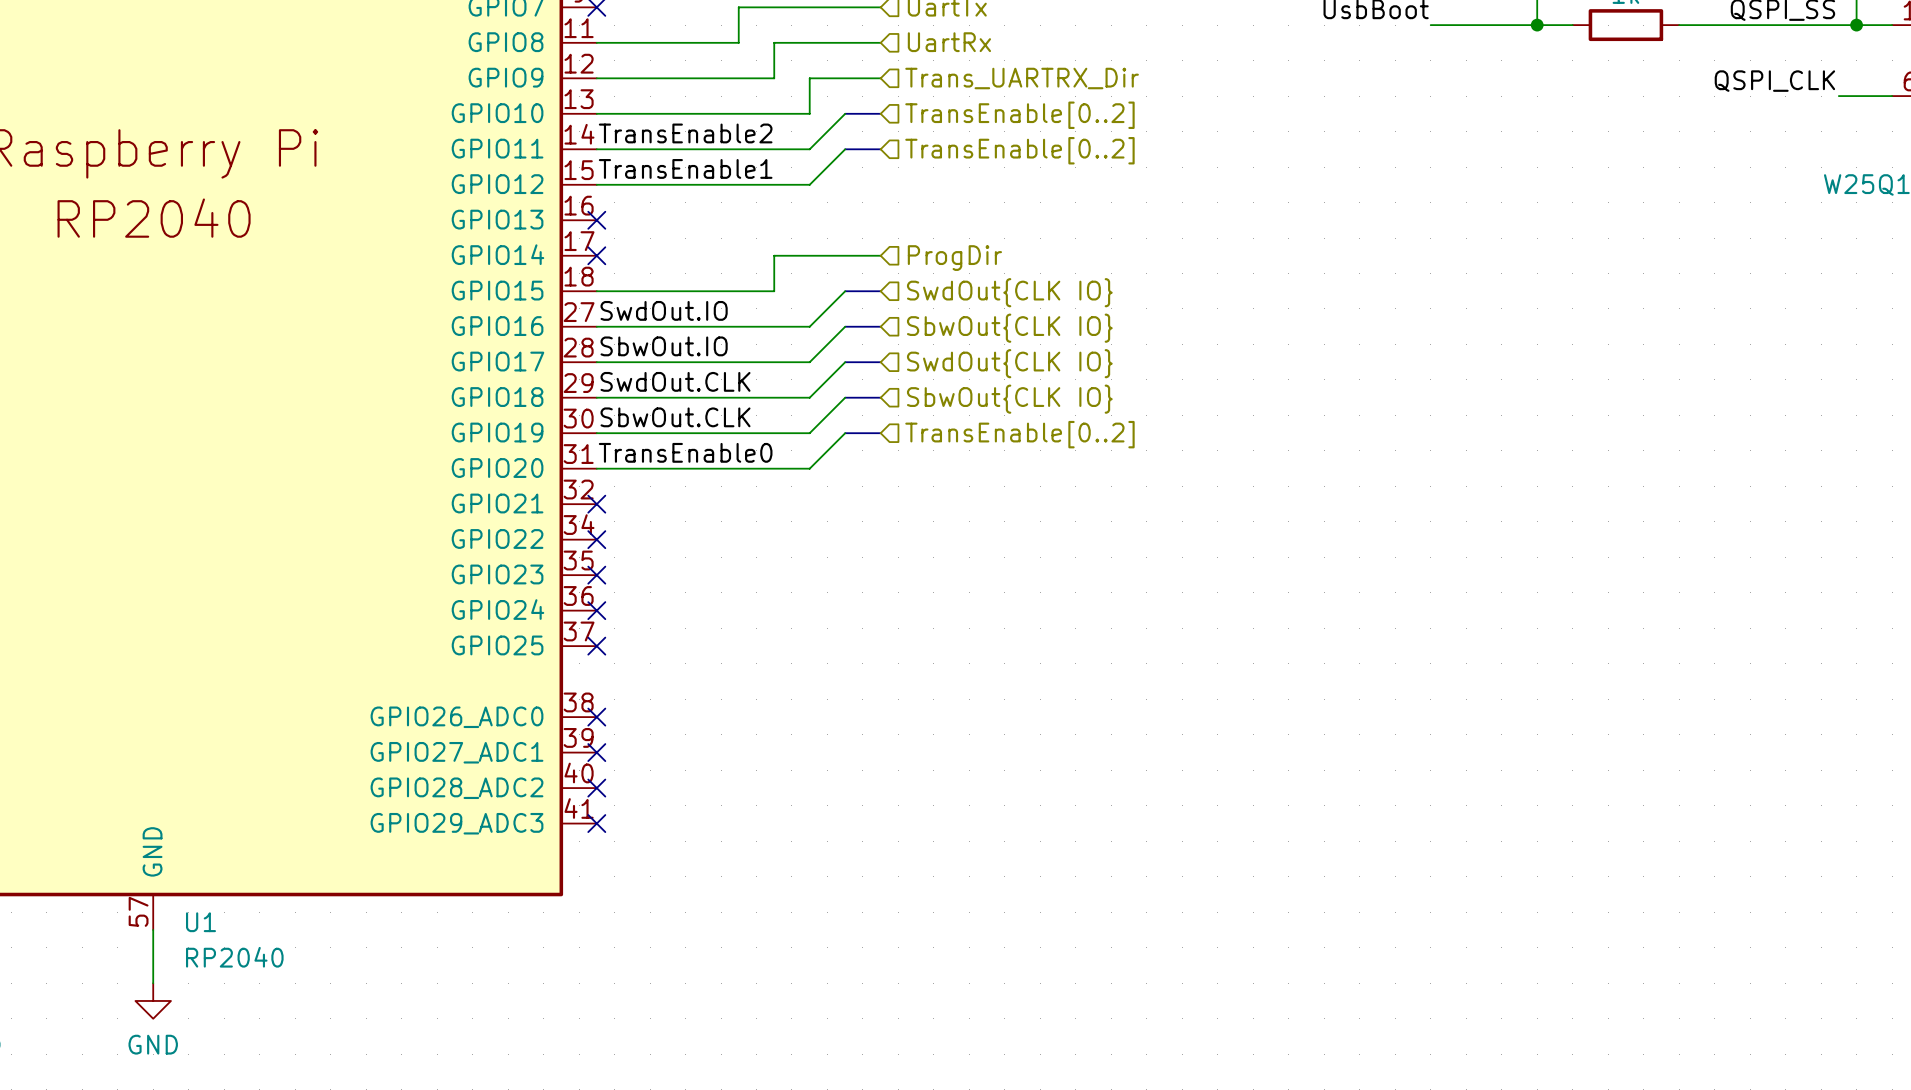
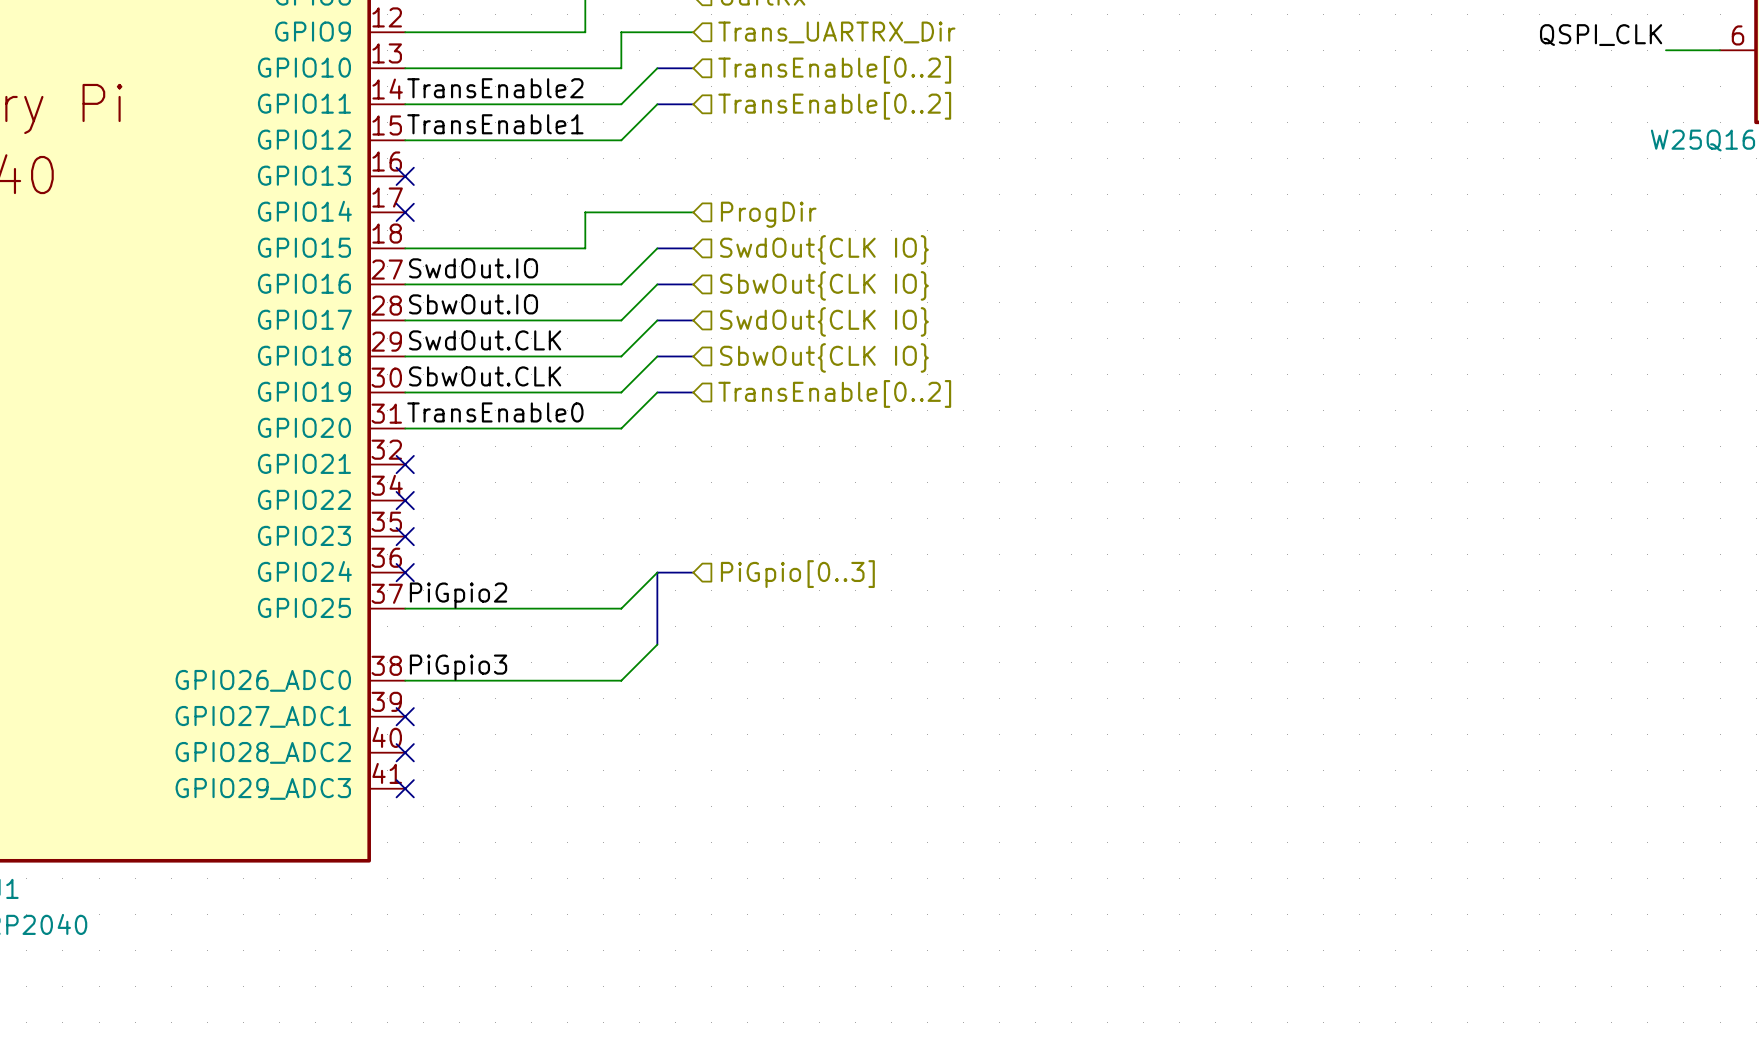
wire: none -> (657, 572) (621, 608) (405, 608)
bus: none -> (693, 572) (657, 572) (657, 644)
hierarchical label: none -> PiGpio[0..3] (797, 574)
label: none -> PiGpio2 (458, 595)
no-connect mark: (596, 646) -> none
wire: none -> (657, 644) (621, 680) (405, 680)
label: none -> PiGpio3 (458, 667)
no-connect mark: (596, 717) -> none

